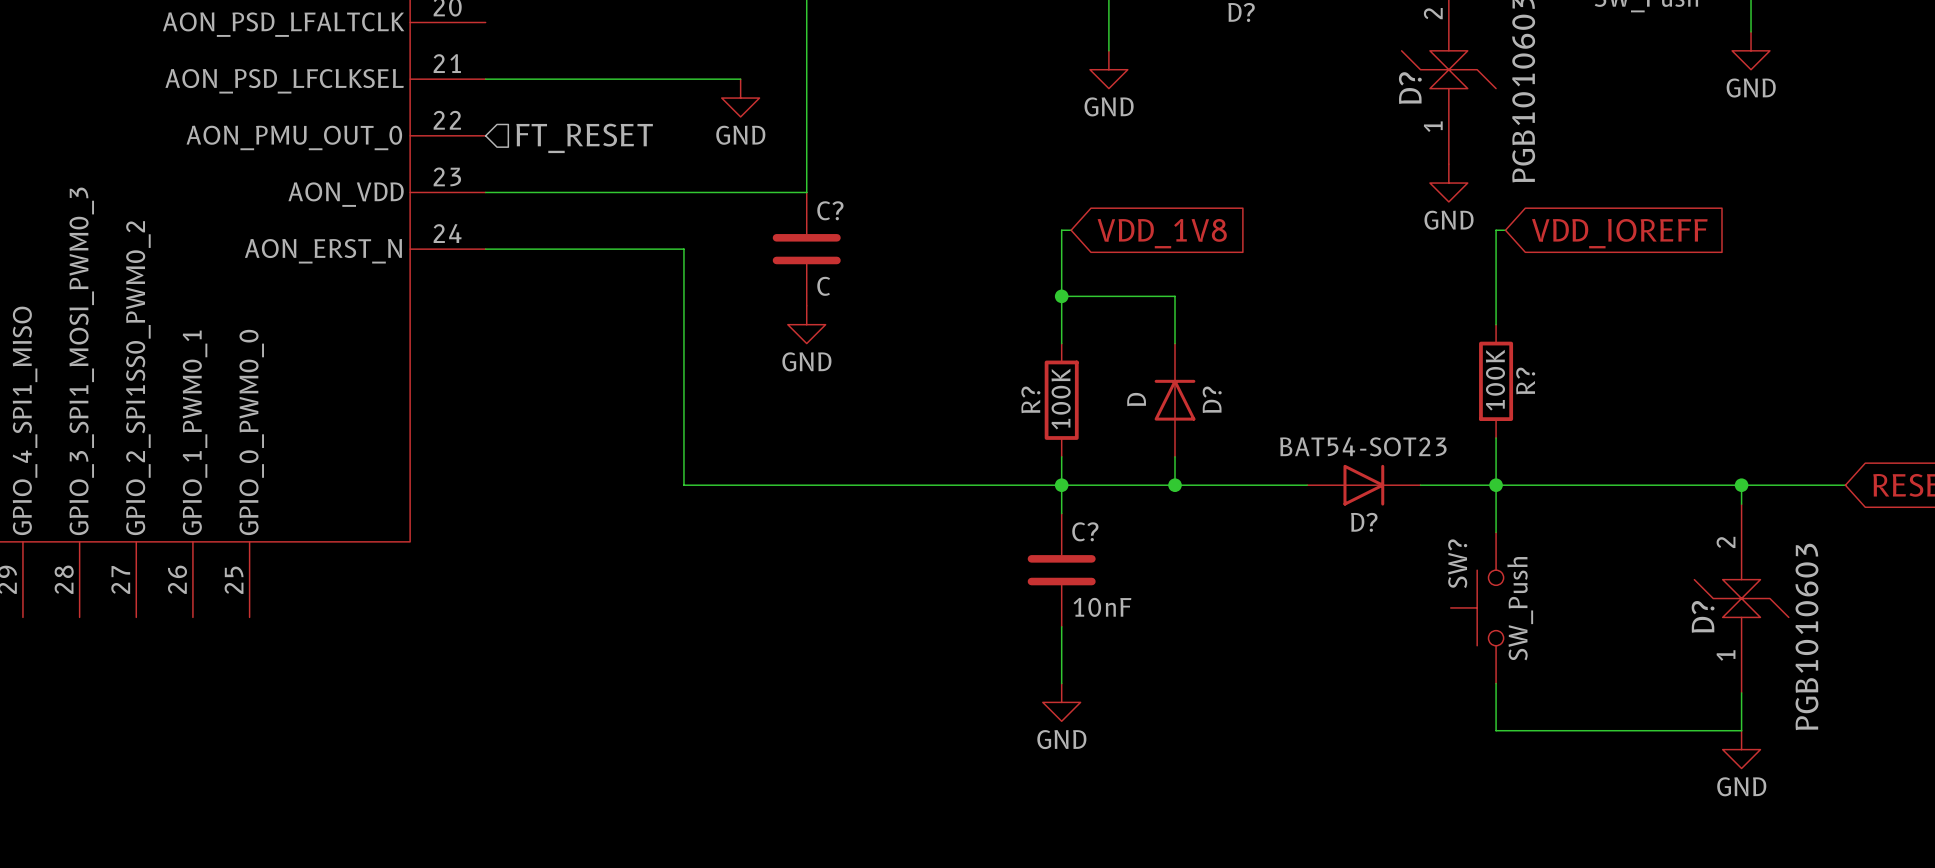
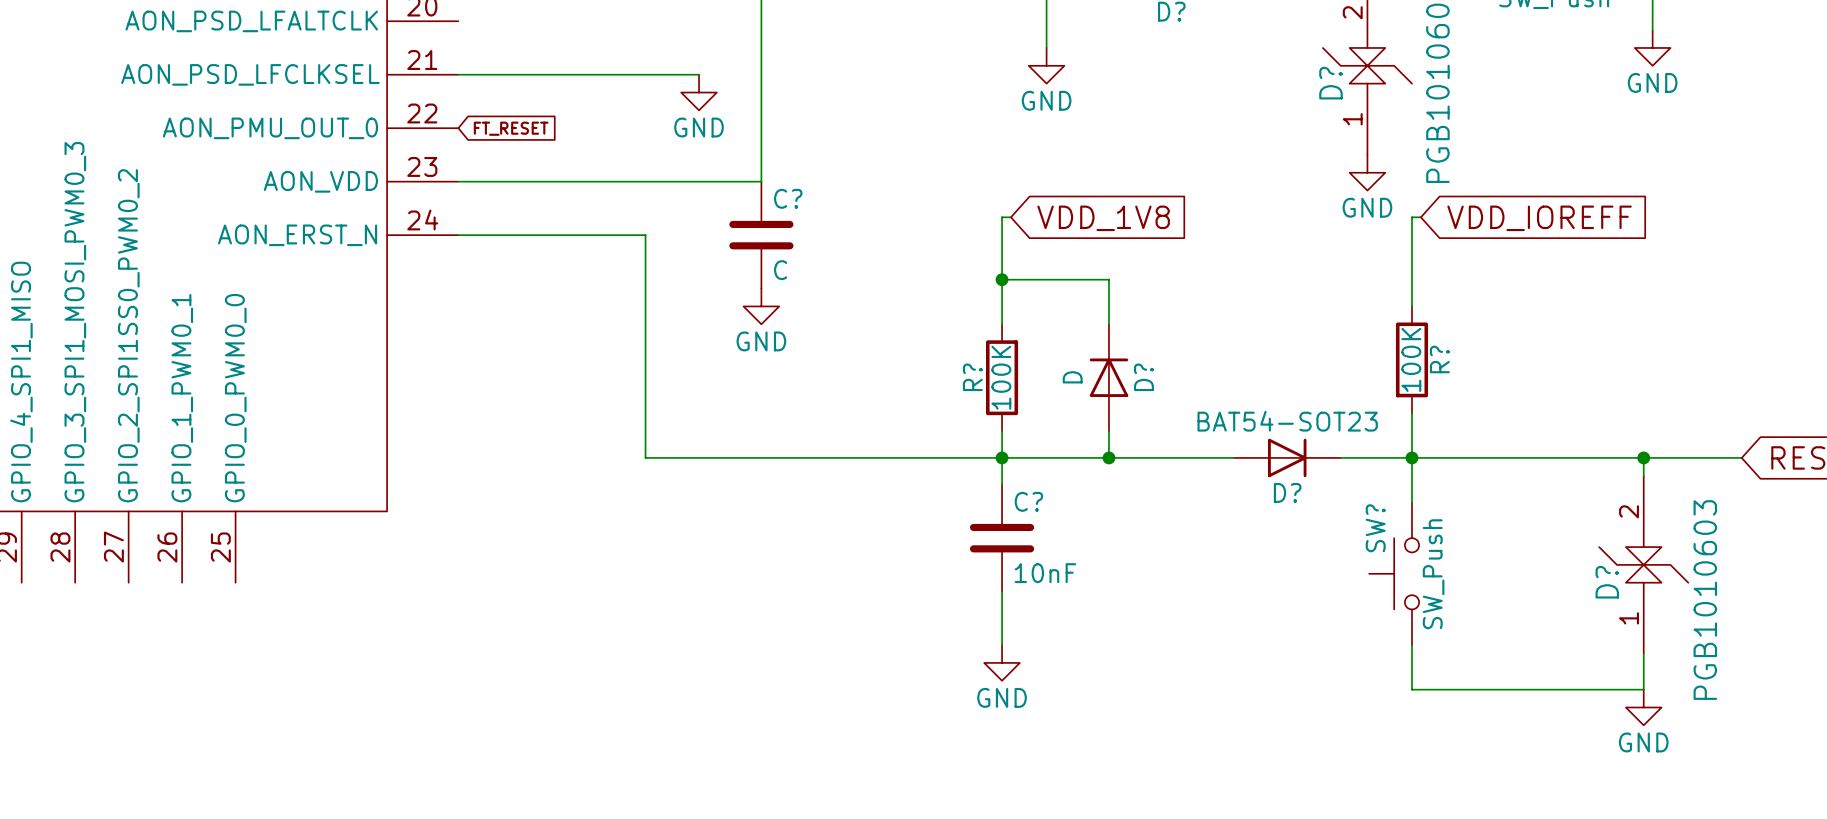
global label: none -> FT_RESET (511, 128)
hierarchical label: FT_RESET (584, 138) -> none

